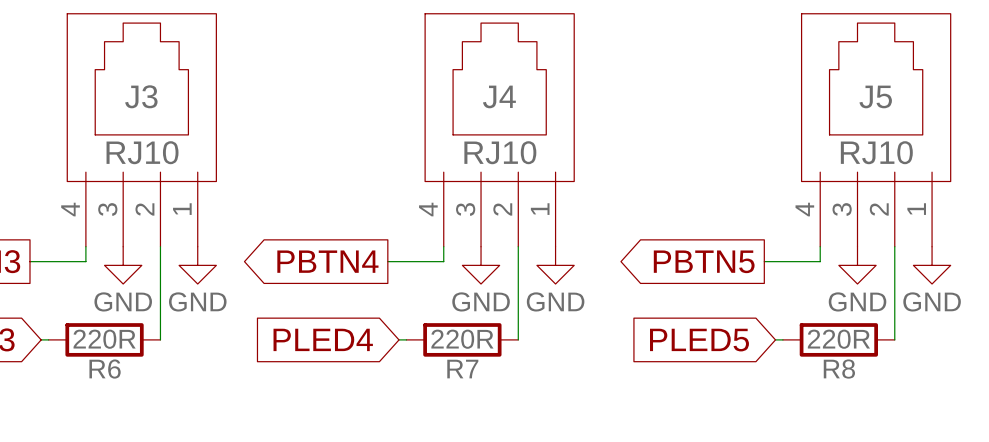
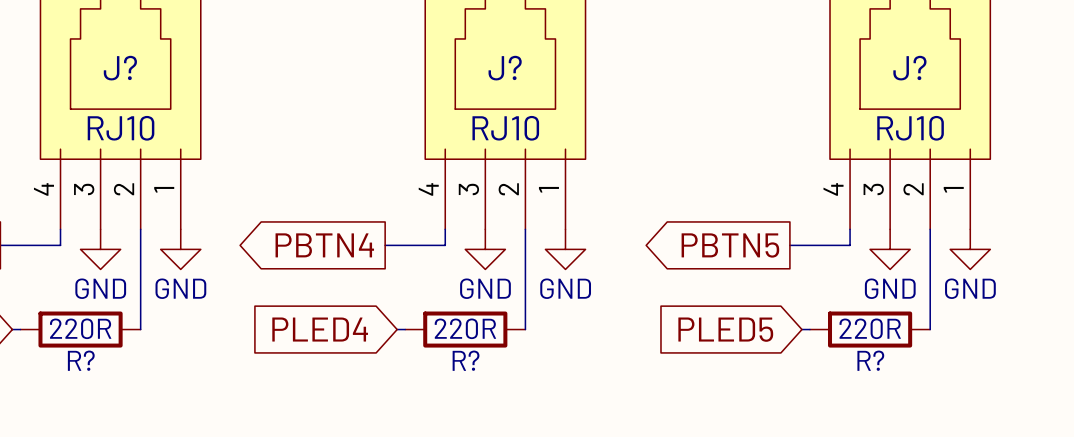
J3 name: J3 (141, 96) -> J? (120, 68)
J4 name: J4 (499, 96) -> J? (505, 68)
J5 name: J5 (875, 96) -> J? (909, 68)
R6 name: R6 (105, 369) -> R? (81, 360)
R7 name: R7 (462, 369) -> R? (466, 360)
R8 name: R8 (839, 369) -> R? (870, 360)

